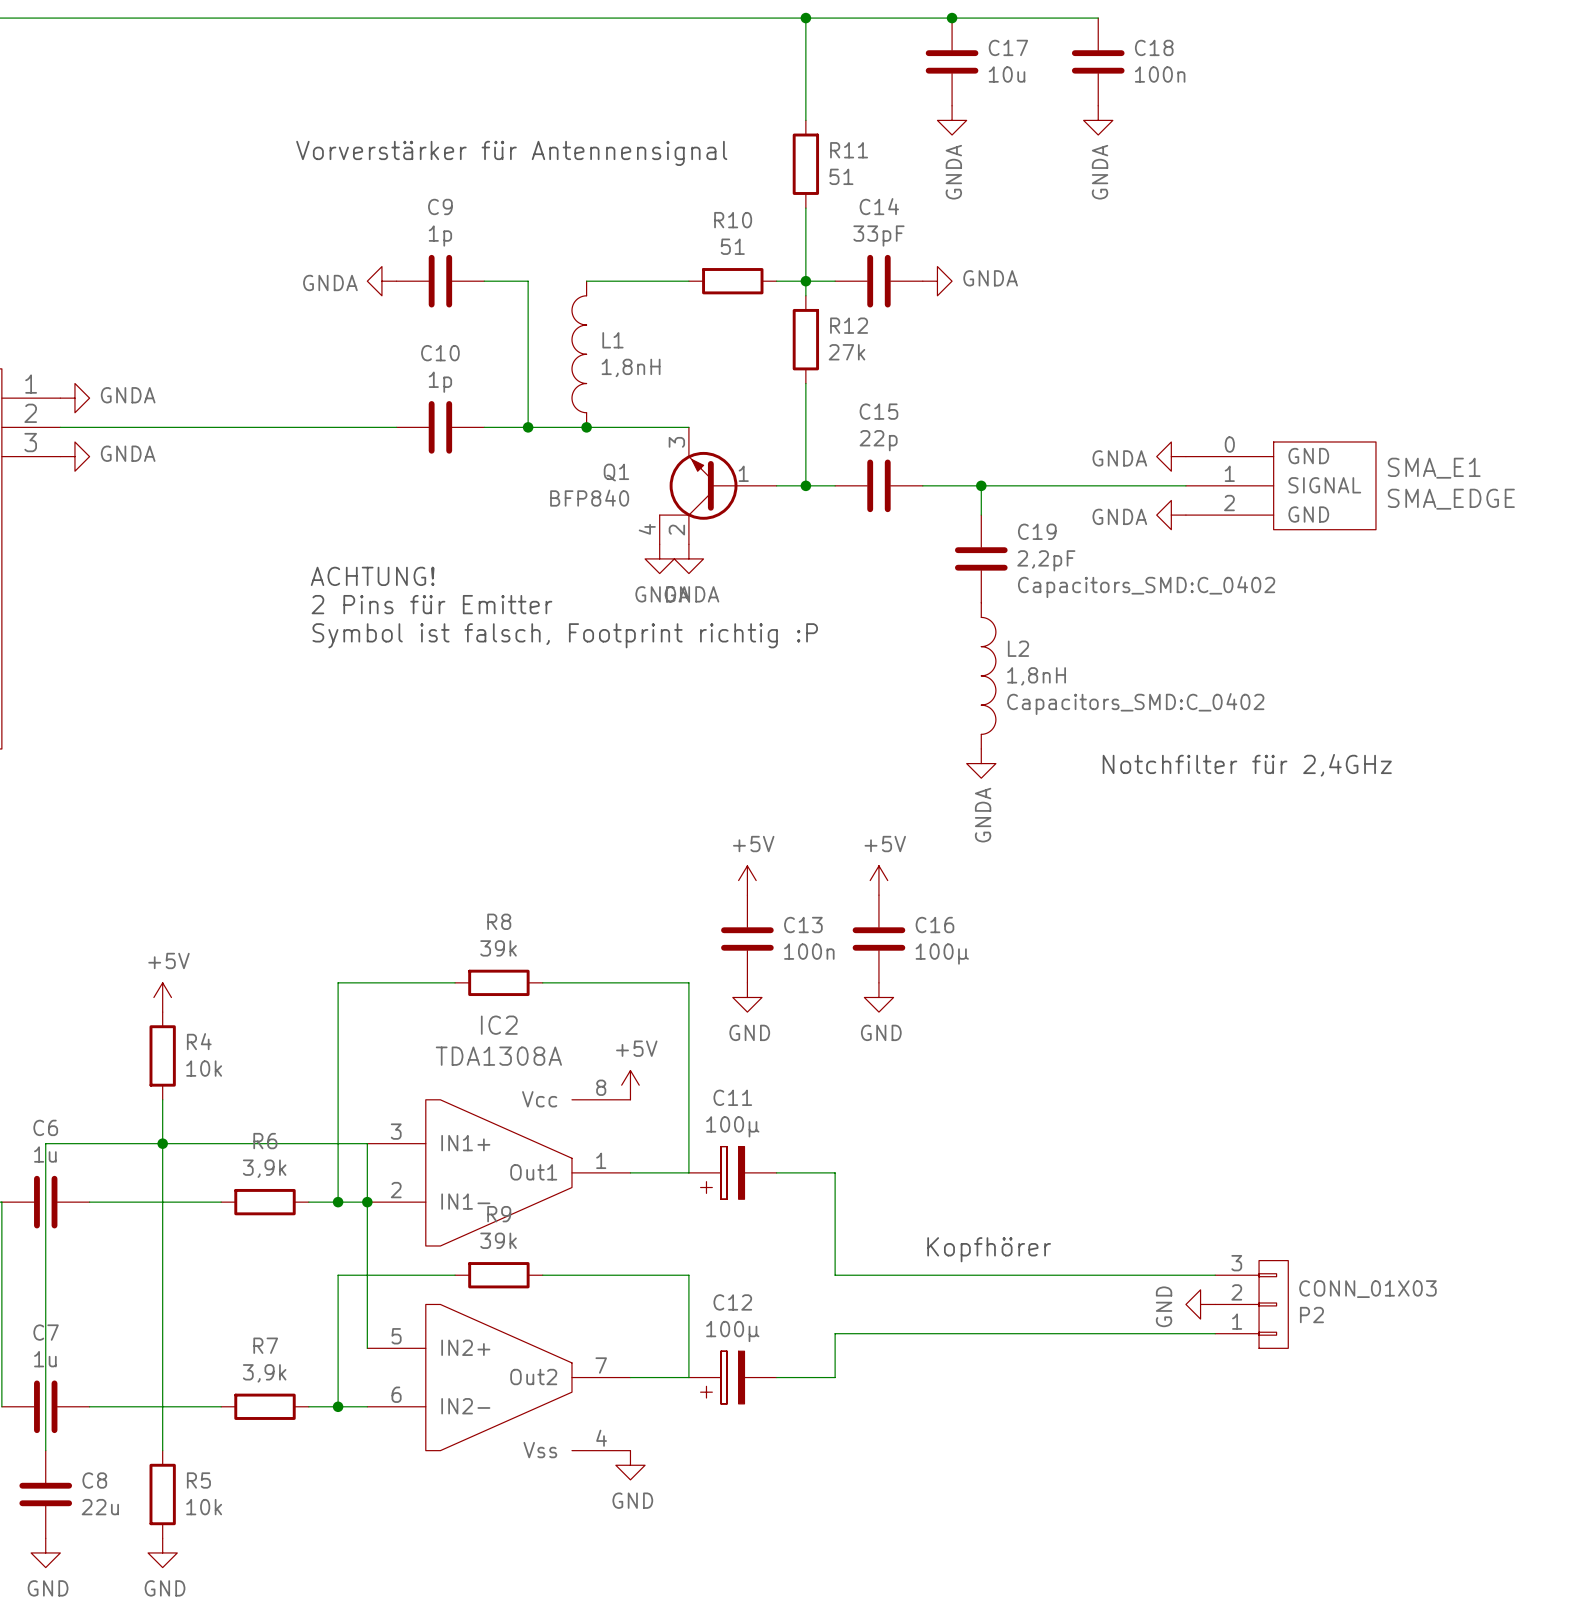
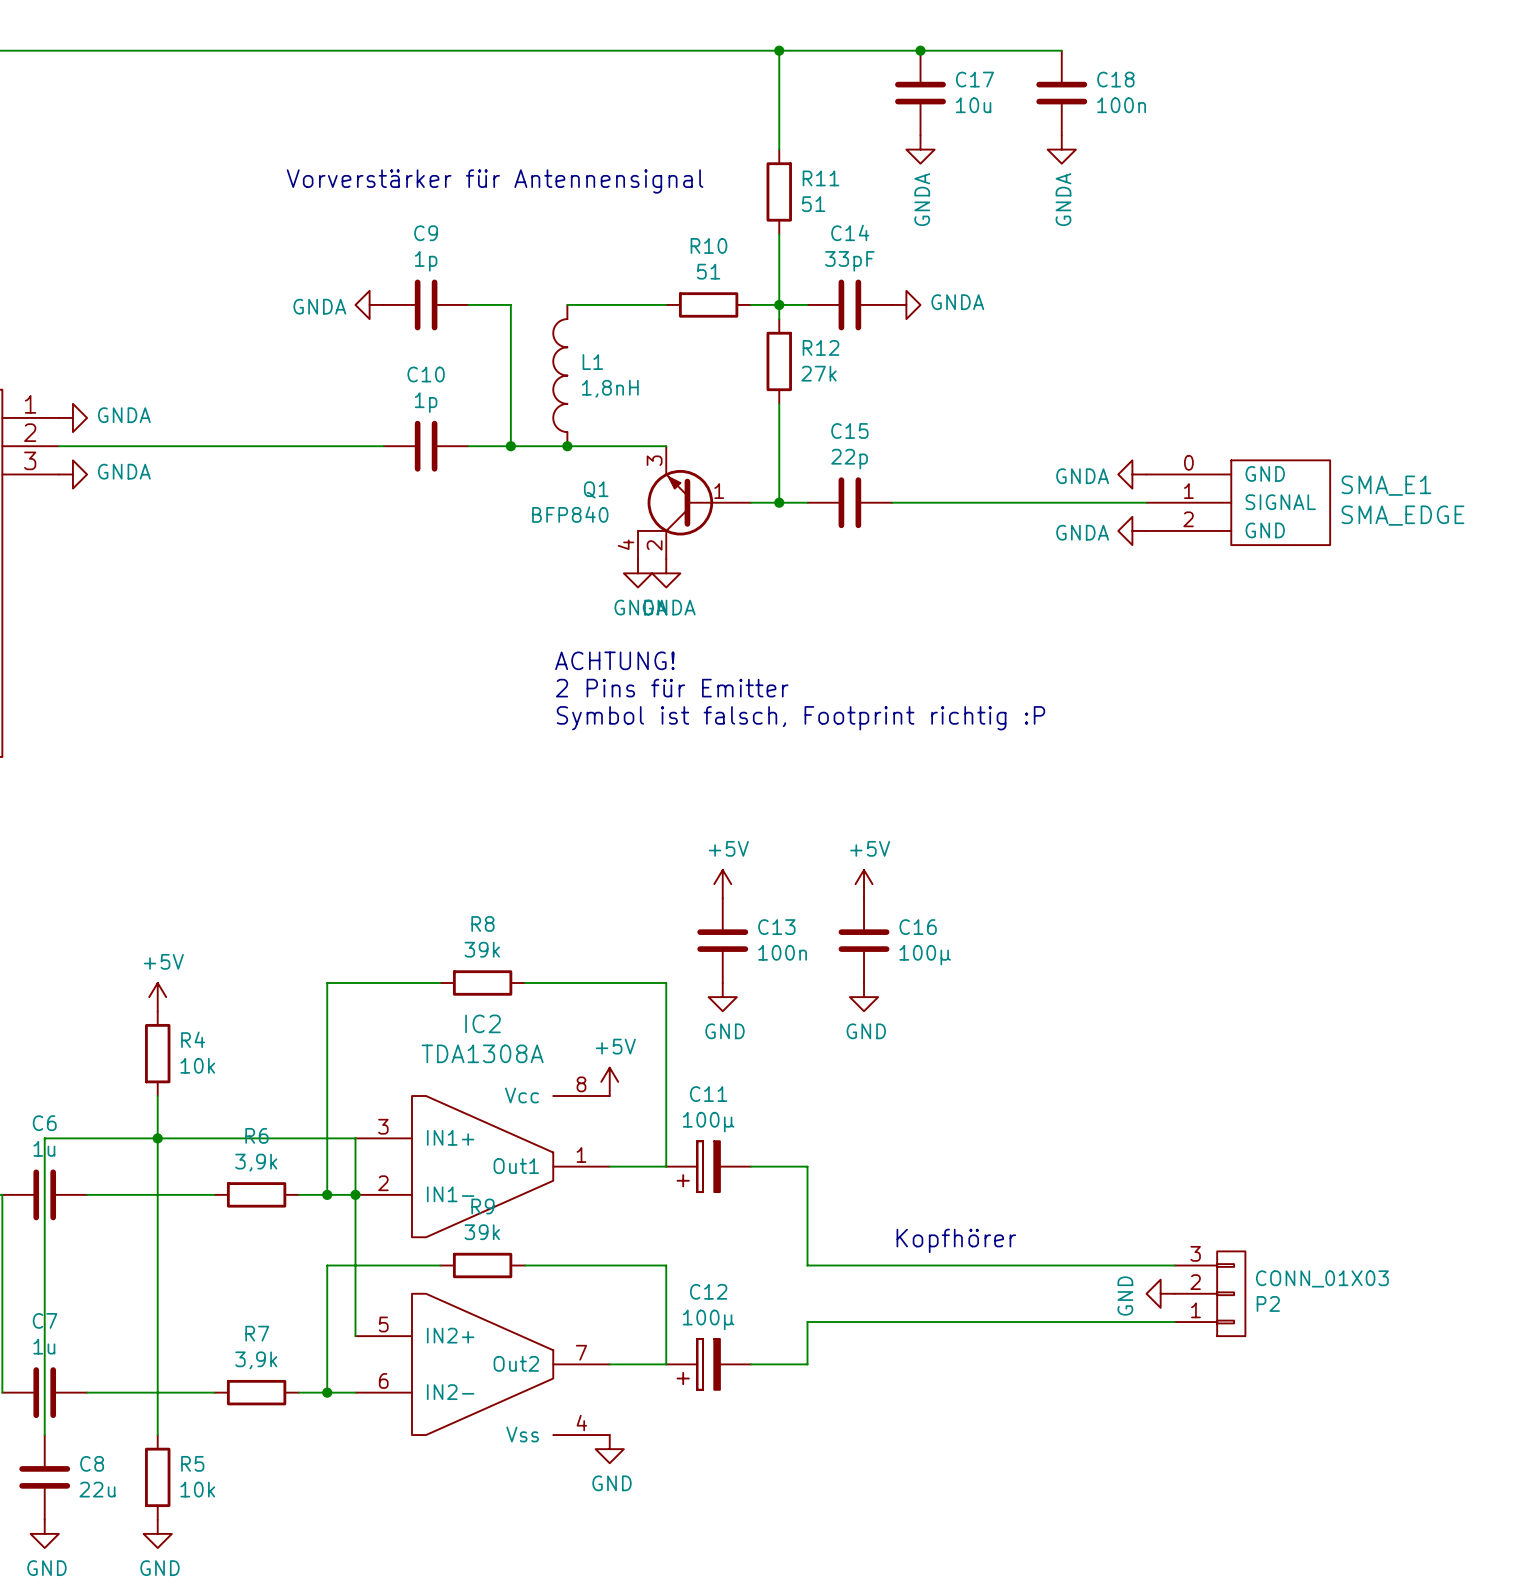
wire: (981, 485) (981, 515) -> none
junction: (981, 485) -> none
C19: 2,2pF (981, 558) -> none
text position: ACHTUNG! (372, 576) -> ACHTUNG! (614, 660)
text position: 2 Pins für Emitter (431, 604) -> 2 Pins für Emitter (672, 688)
text position: Symbol ist falsch, Footprint richtig :P (565, 635) -> Symbol ist falsch, Footprint richtig :P (800, 718)
L2: 1,8nH (988, 675) -> none
power symbol: GNDA (981, 763) -> none
text: Notchfilter für 2,4GHz (1247, 765) -> none
power symbol position: +5V (878, 880) -> +5V (864, 884)
C16 position: (878, 939) -> (864, 940)
power symbol position: GND (878, 997) -> GND (864, 997)

